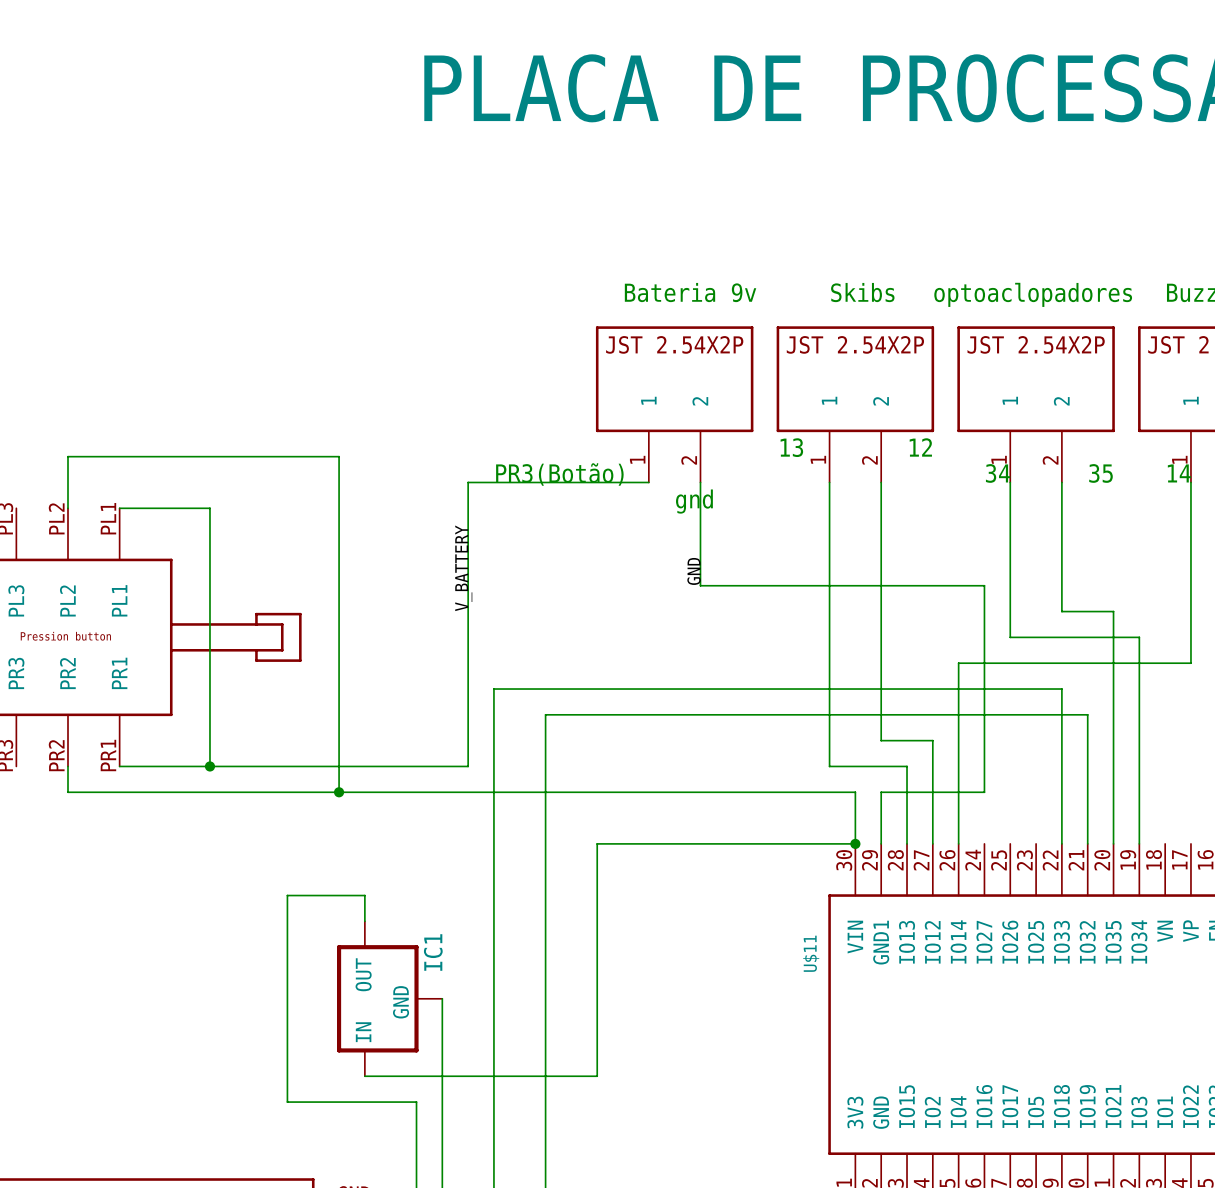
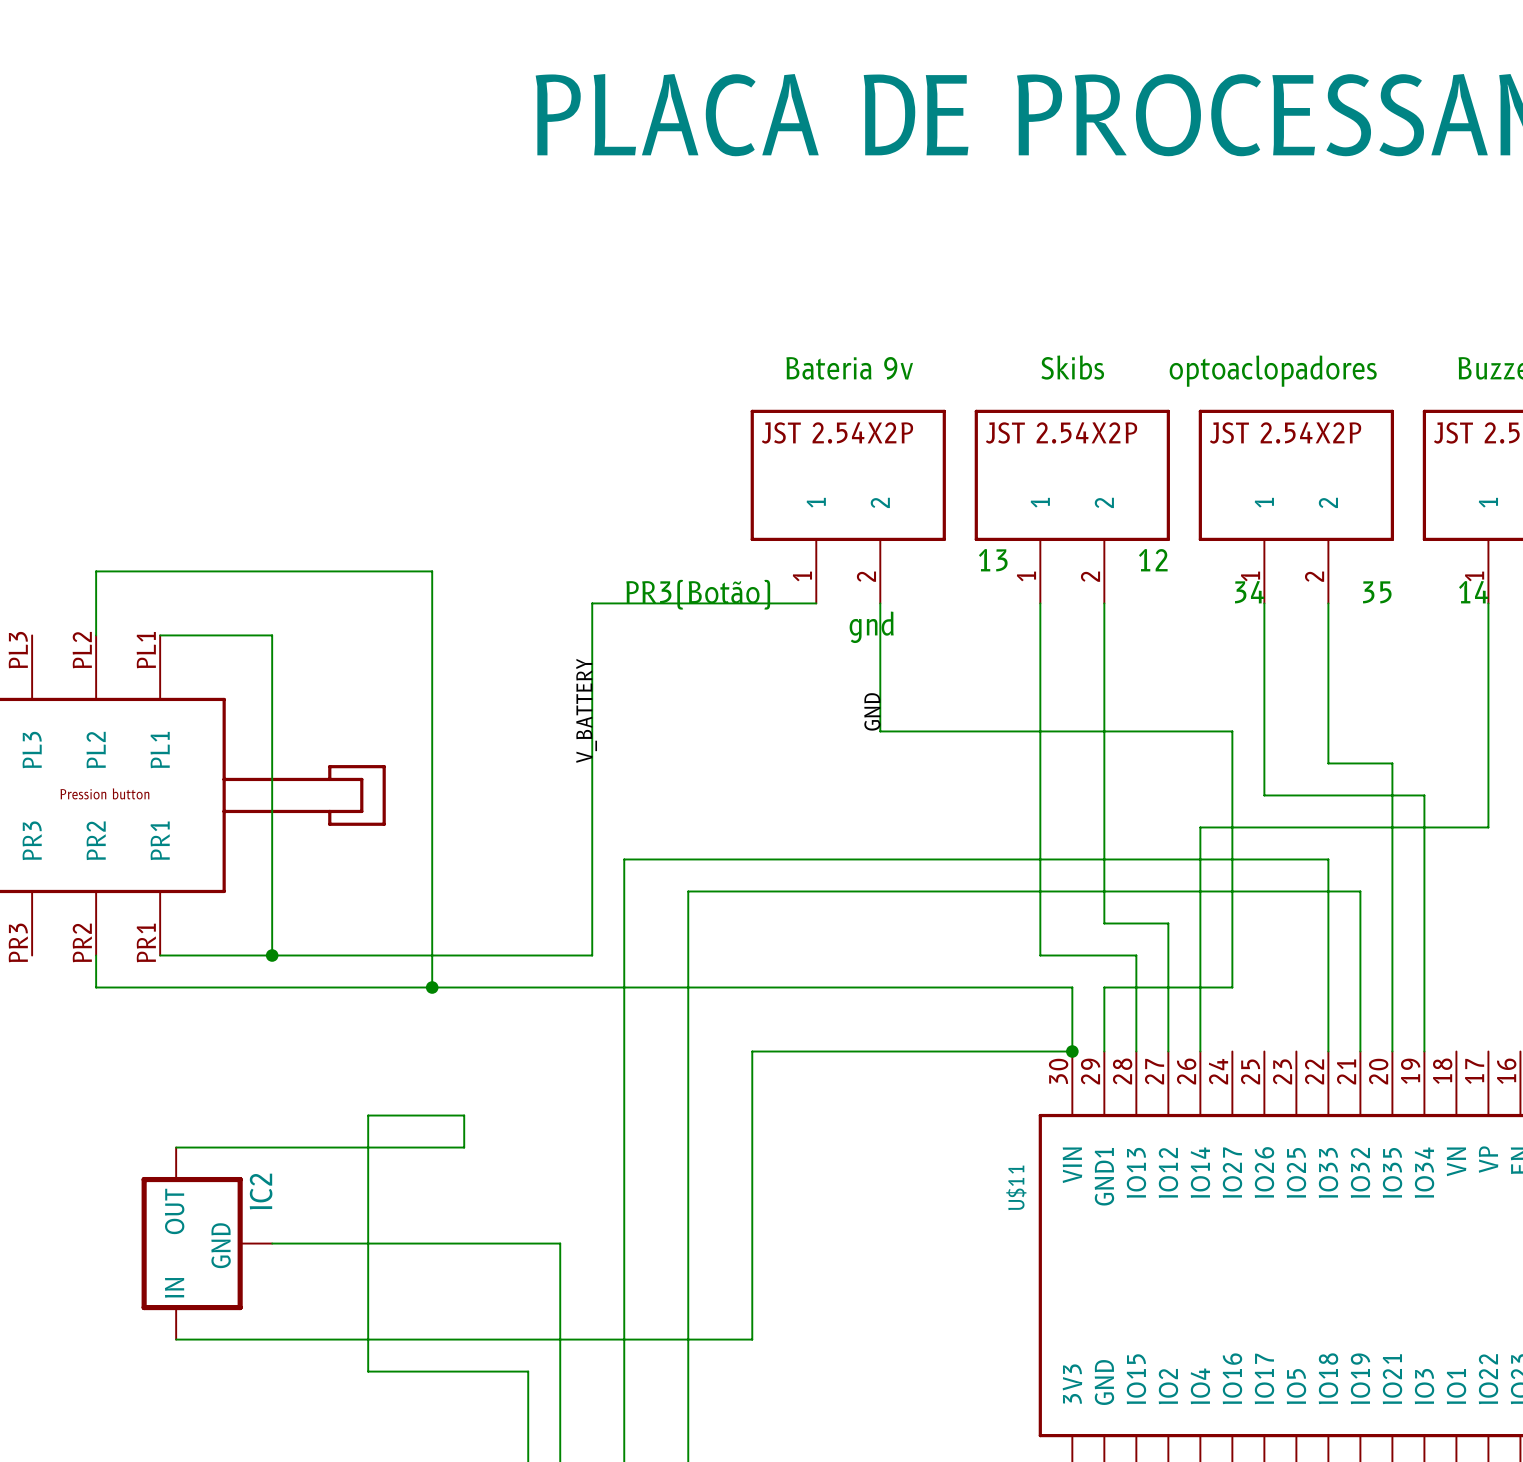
wire: none -> (176, 1147) (464, 1147)
IC2: none -> (206, 1243)
wire: none -> (272, 1243) (560, 1243)
IC1: (389, 998) -> none
wire: none -> (176, 1339) (464, 1339)

